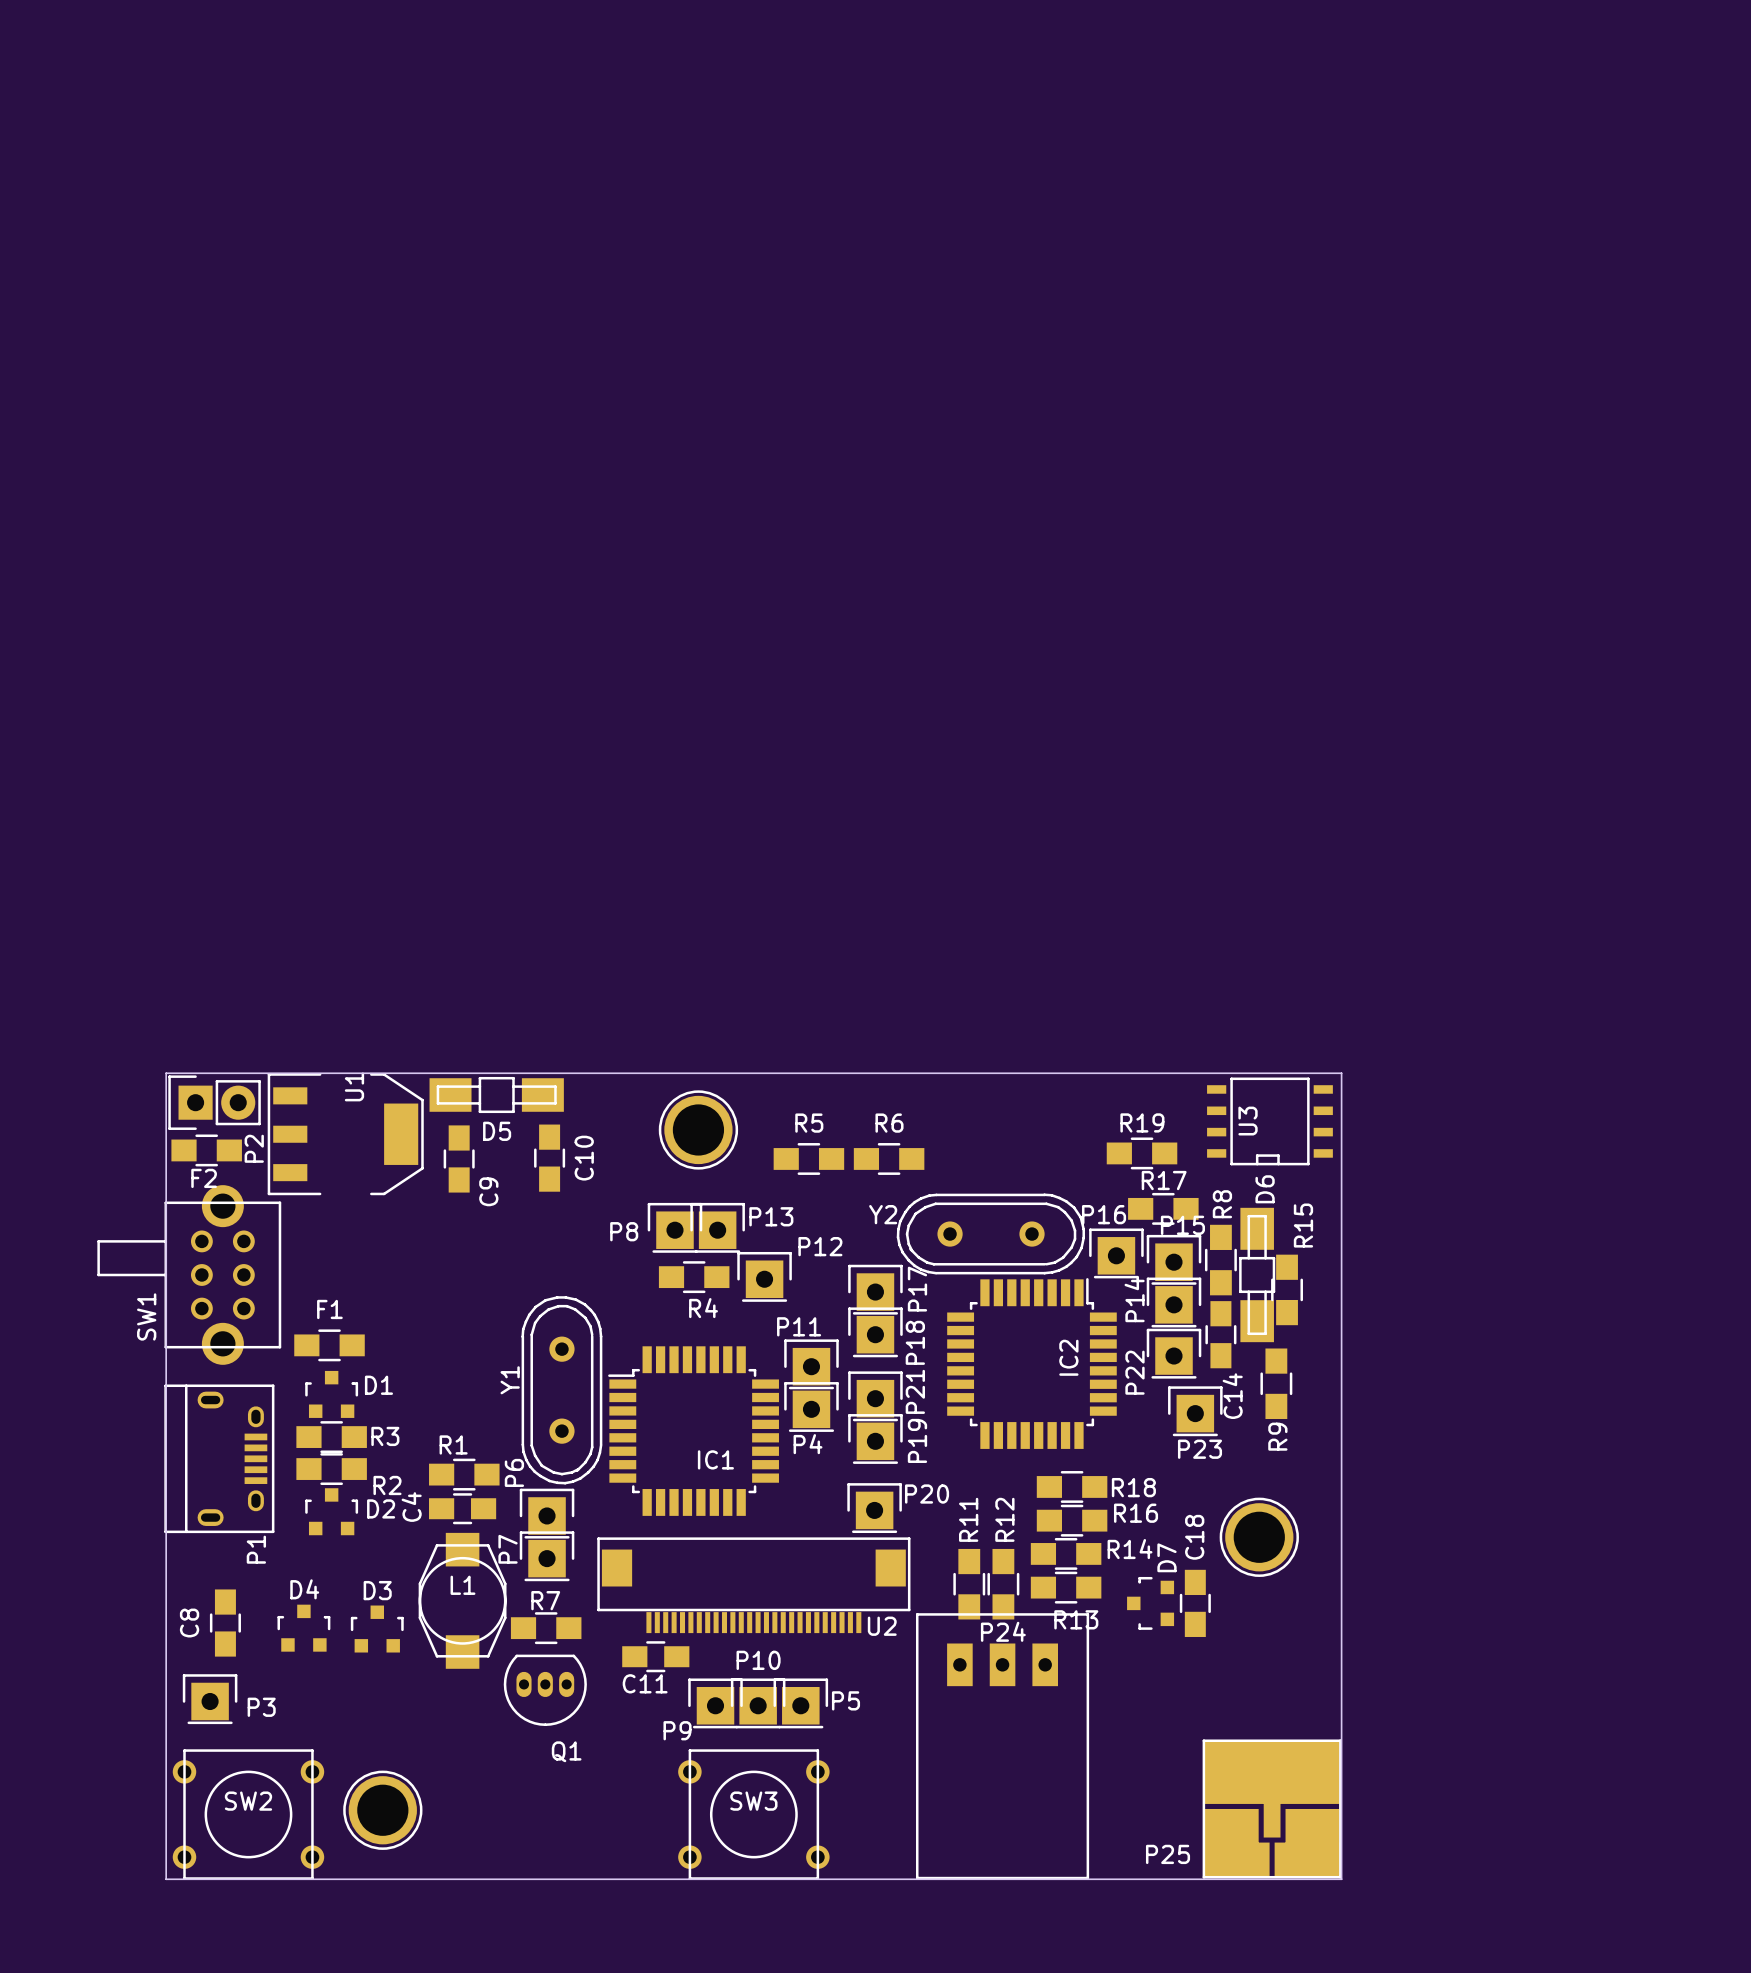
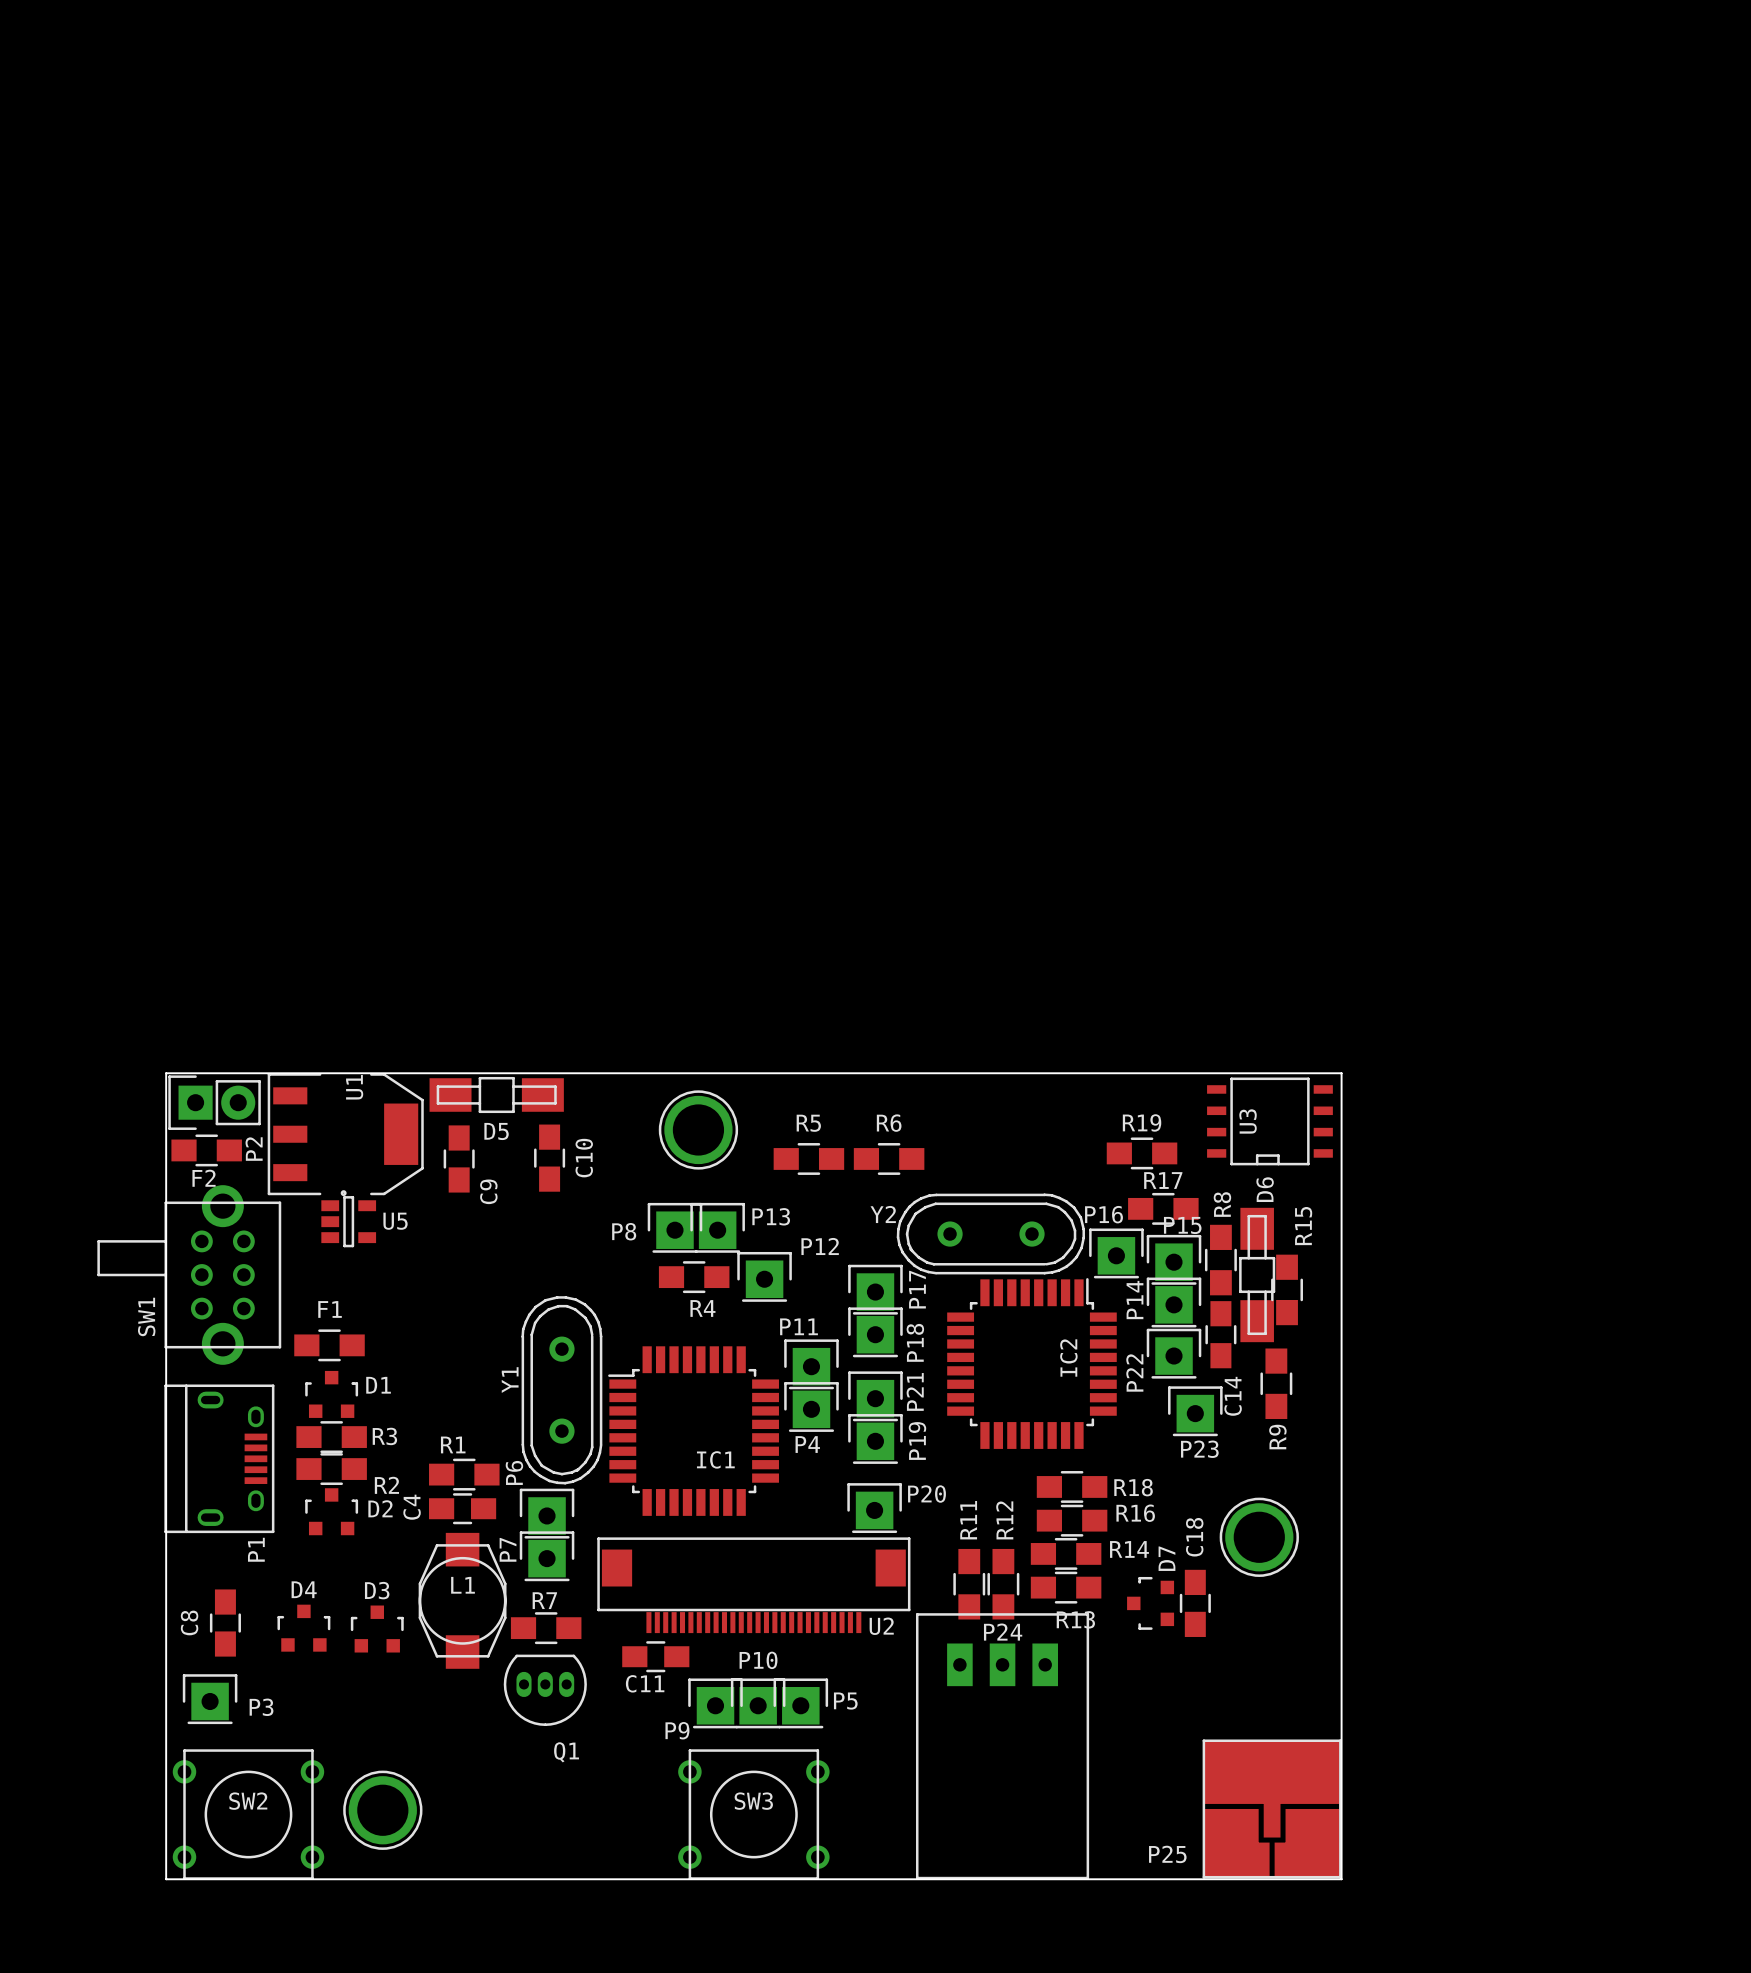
U5: none -> (348, 1218)

